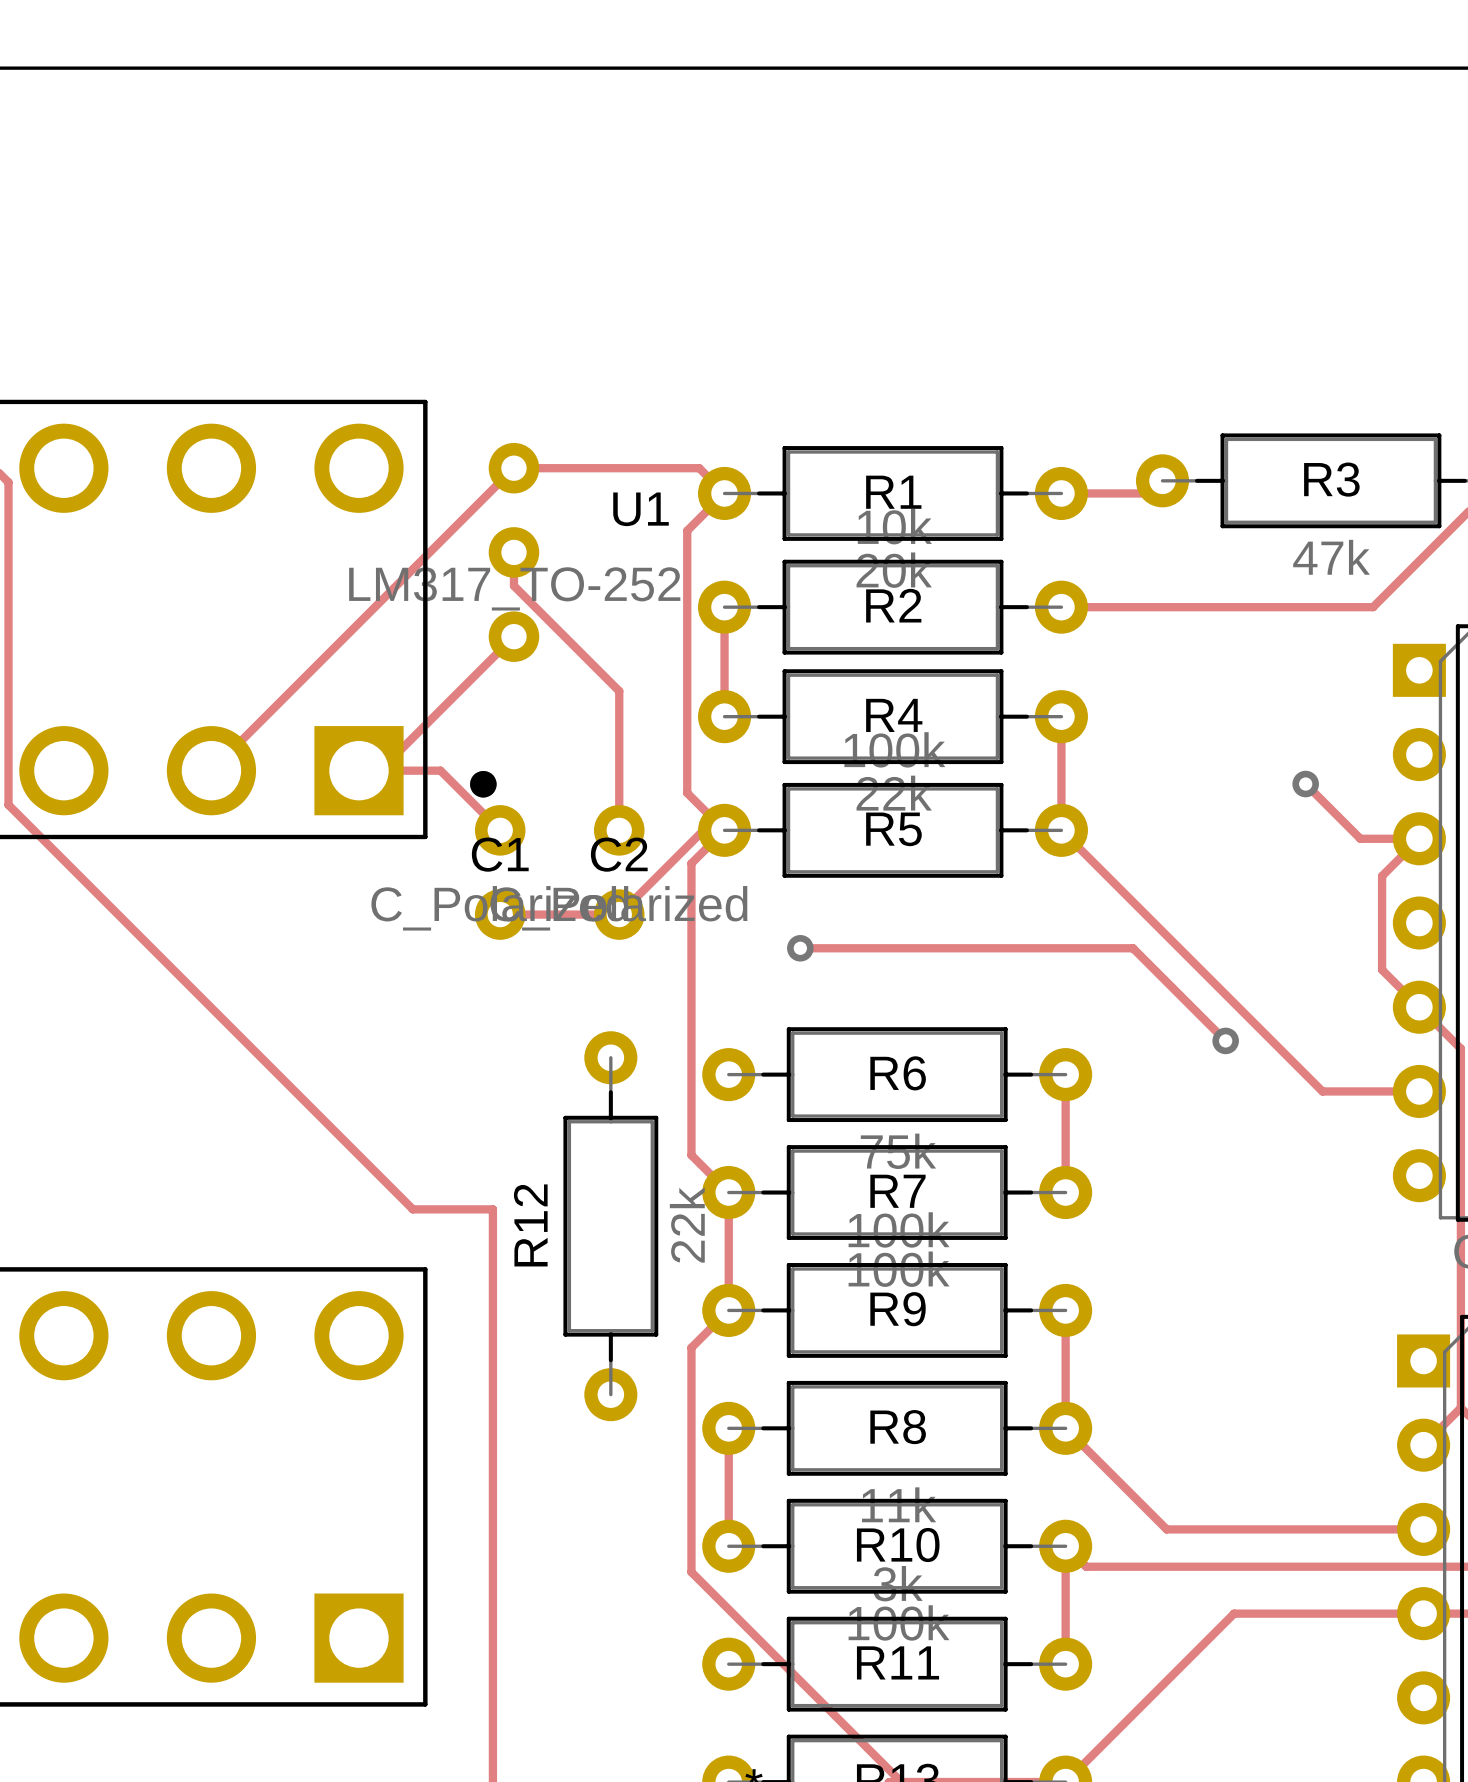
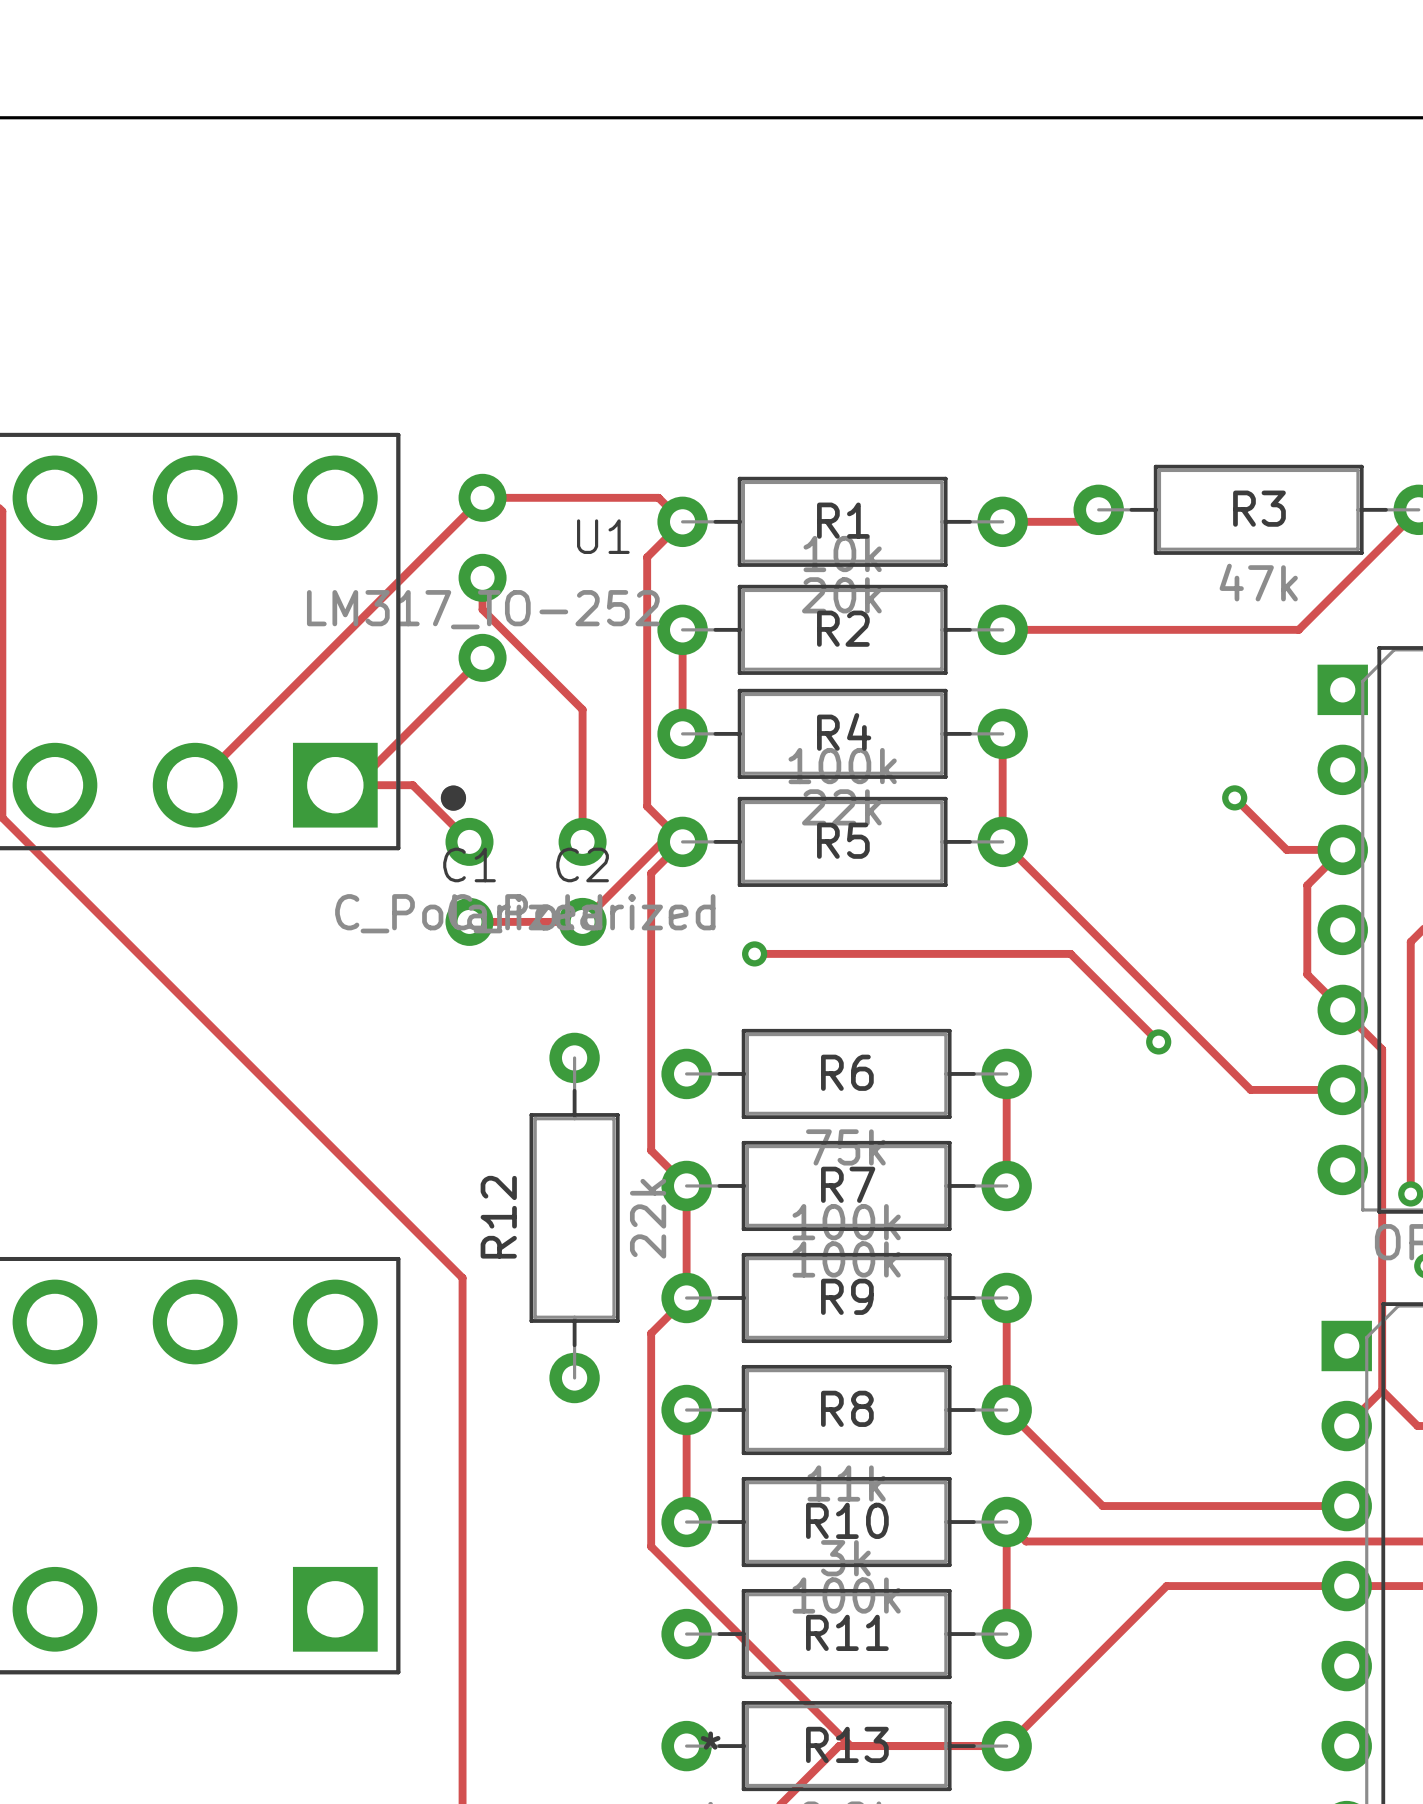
track: (412, 1209) (492, 1209) (492, 1289) -> (386, 1201) (462, 1277)

